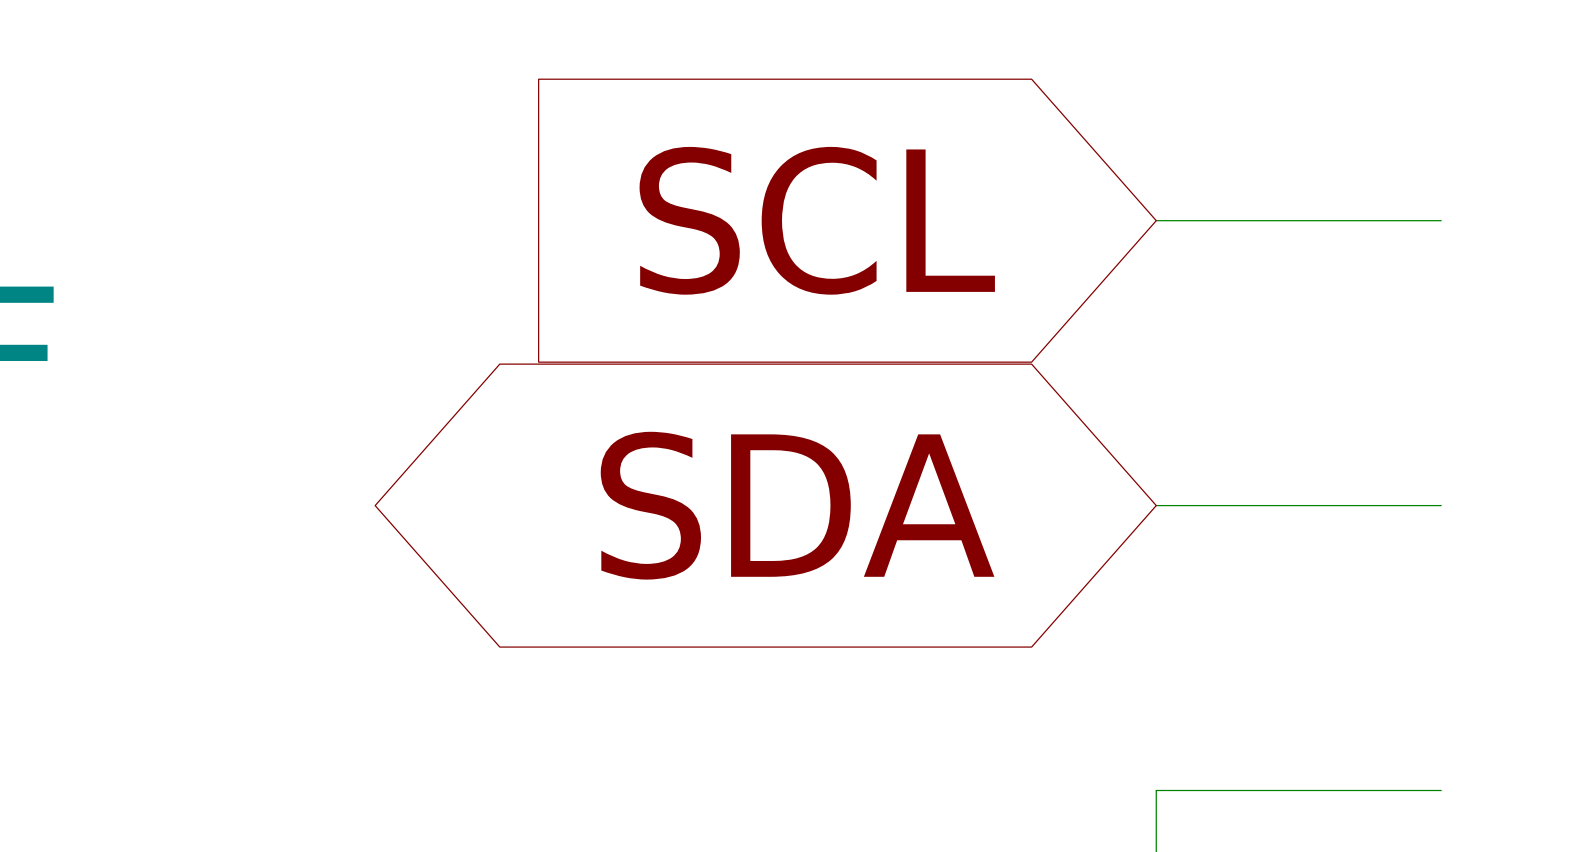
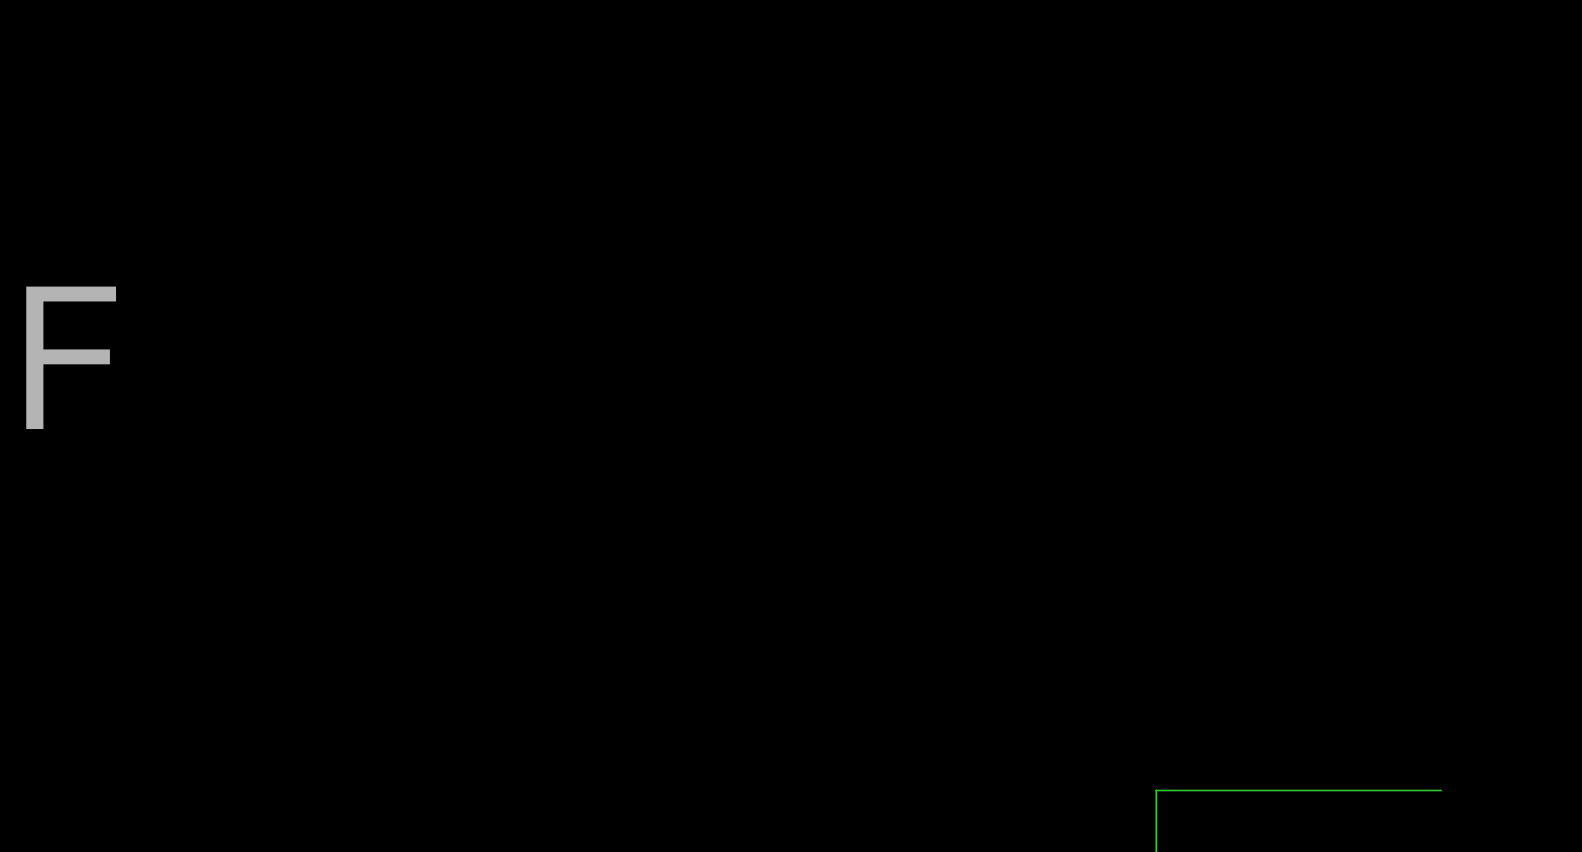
global label: SCL (817, 220) -> none
wire: (1156, 220) (1441, 220) -> none
global label: SDA (797, 505) -> none
wire: (1156, 505) (1441, 505) -> none

